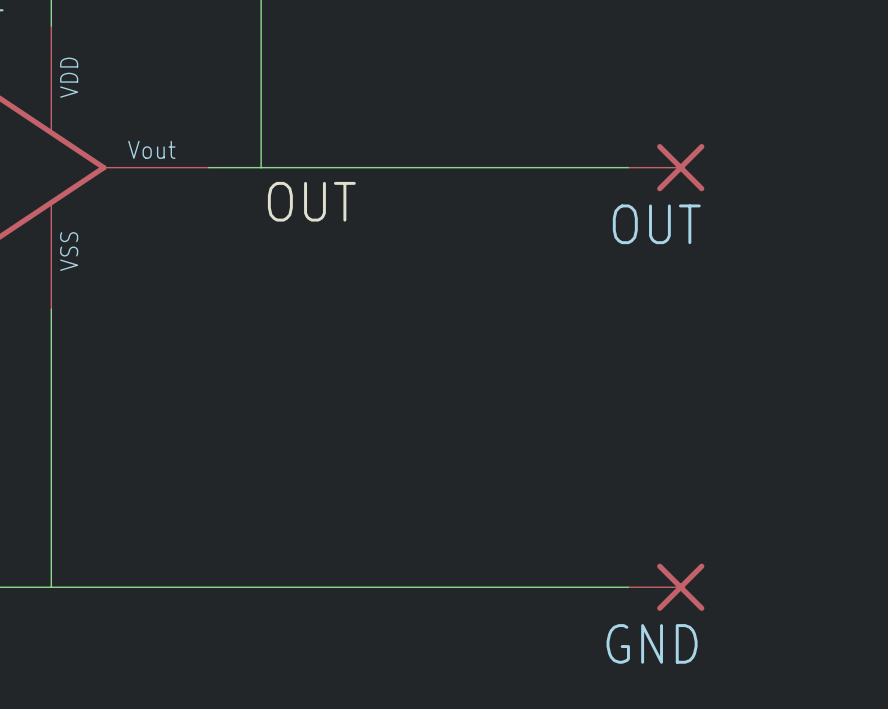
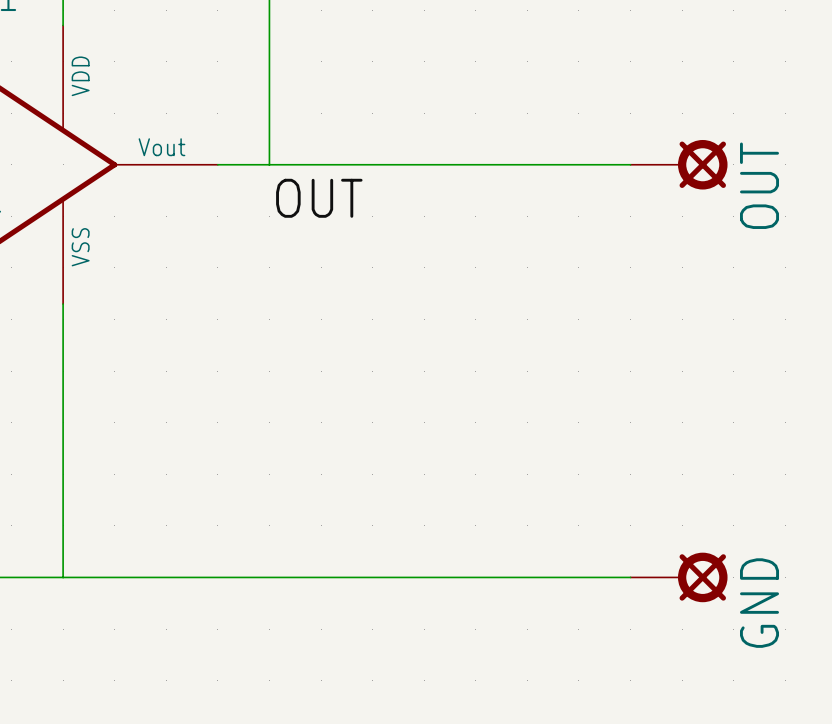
OUT symbol: [628, 144, 705, 192] -> [630, 140, 728, 190]
OUT name position: OUT (656, 224) -> OUT (759, 185)
GND symbol: [628, 563, 705, 611] -> [630, 552, 728, 603]
GND name position: GND (652, 643) -> GND (759, 603)

